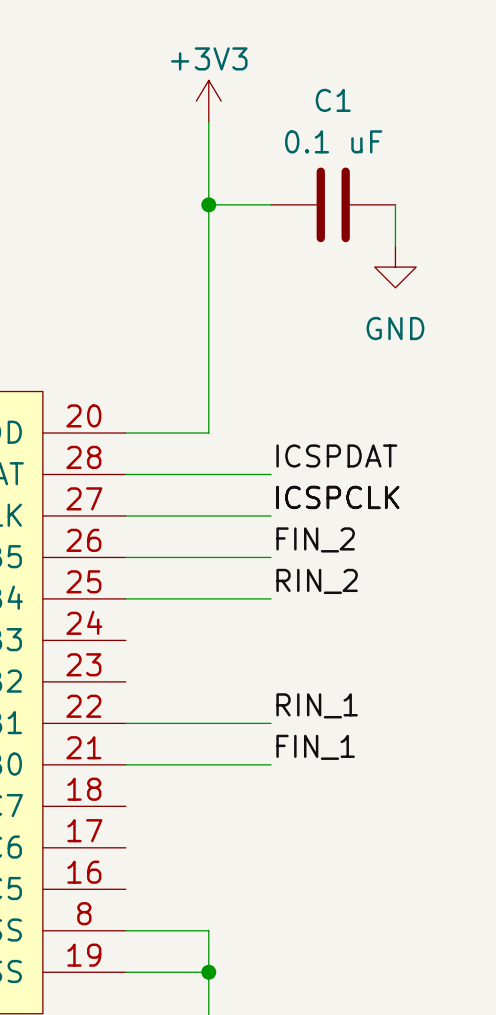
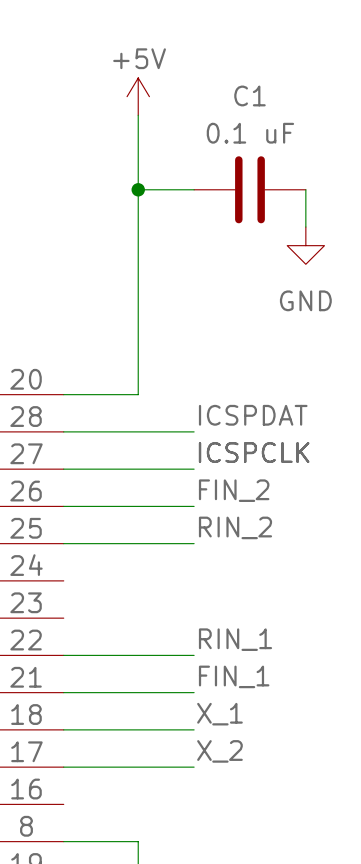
power symbol: +3V3 (208, 101) -> +5V (138, 96)
label: none -> X_1 (219, 714)
wire: none -> (63, 729) (194, 729)
label: none -> X_2 (219, 751)
wire: none -> (63, 767) (194, 767)

